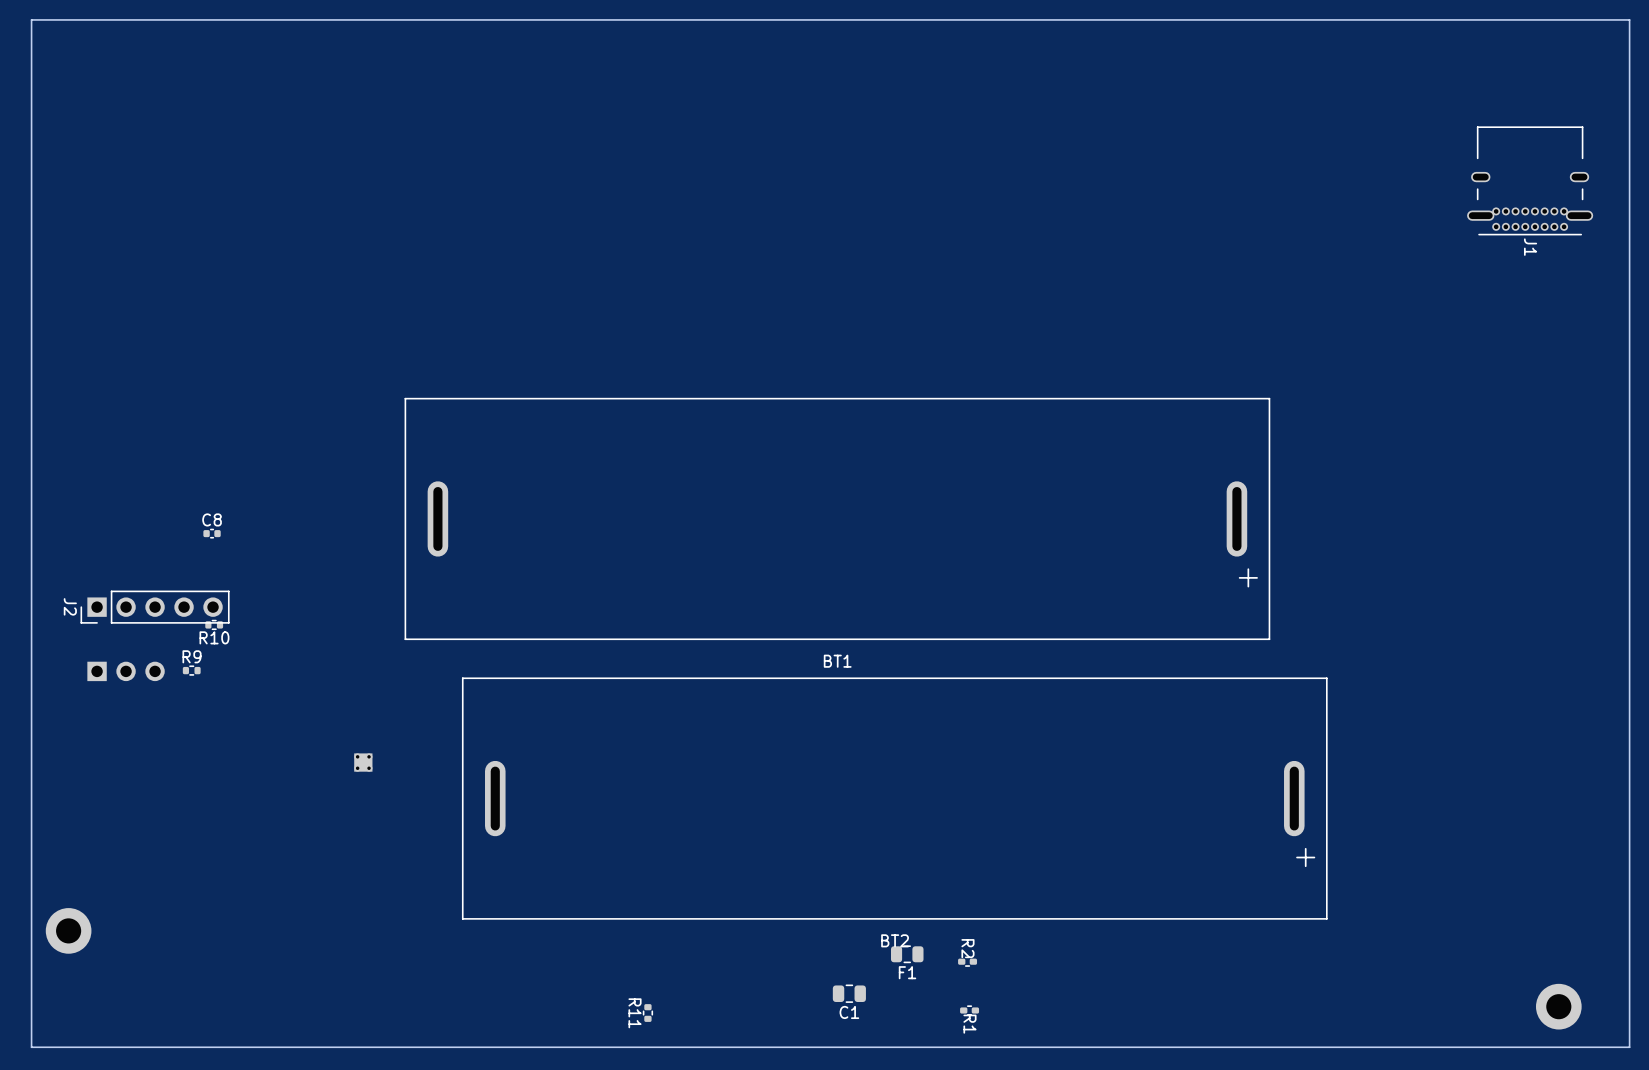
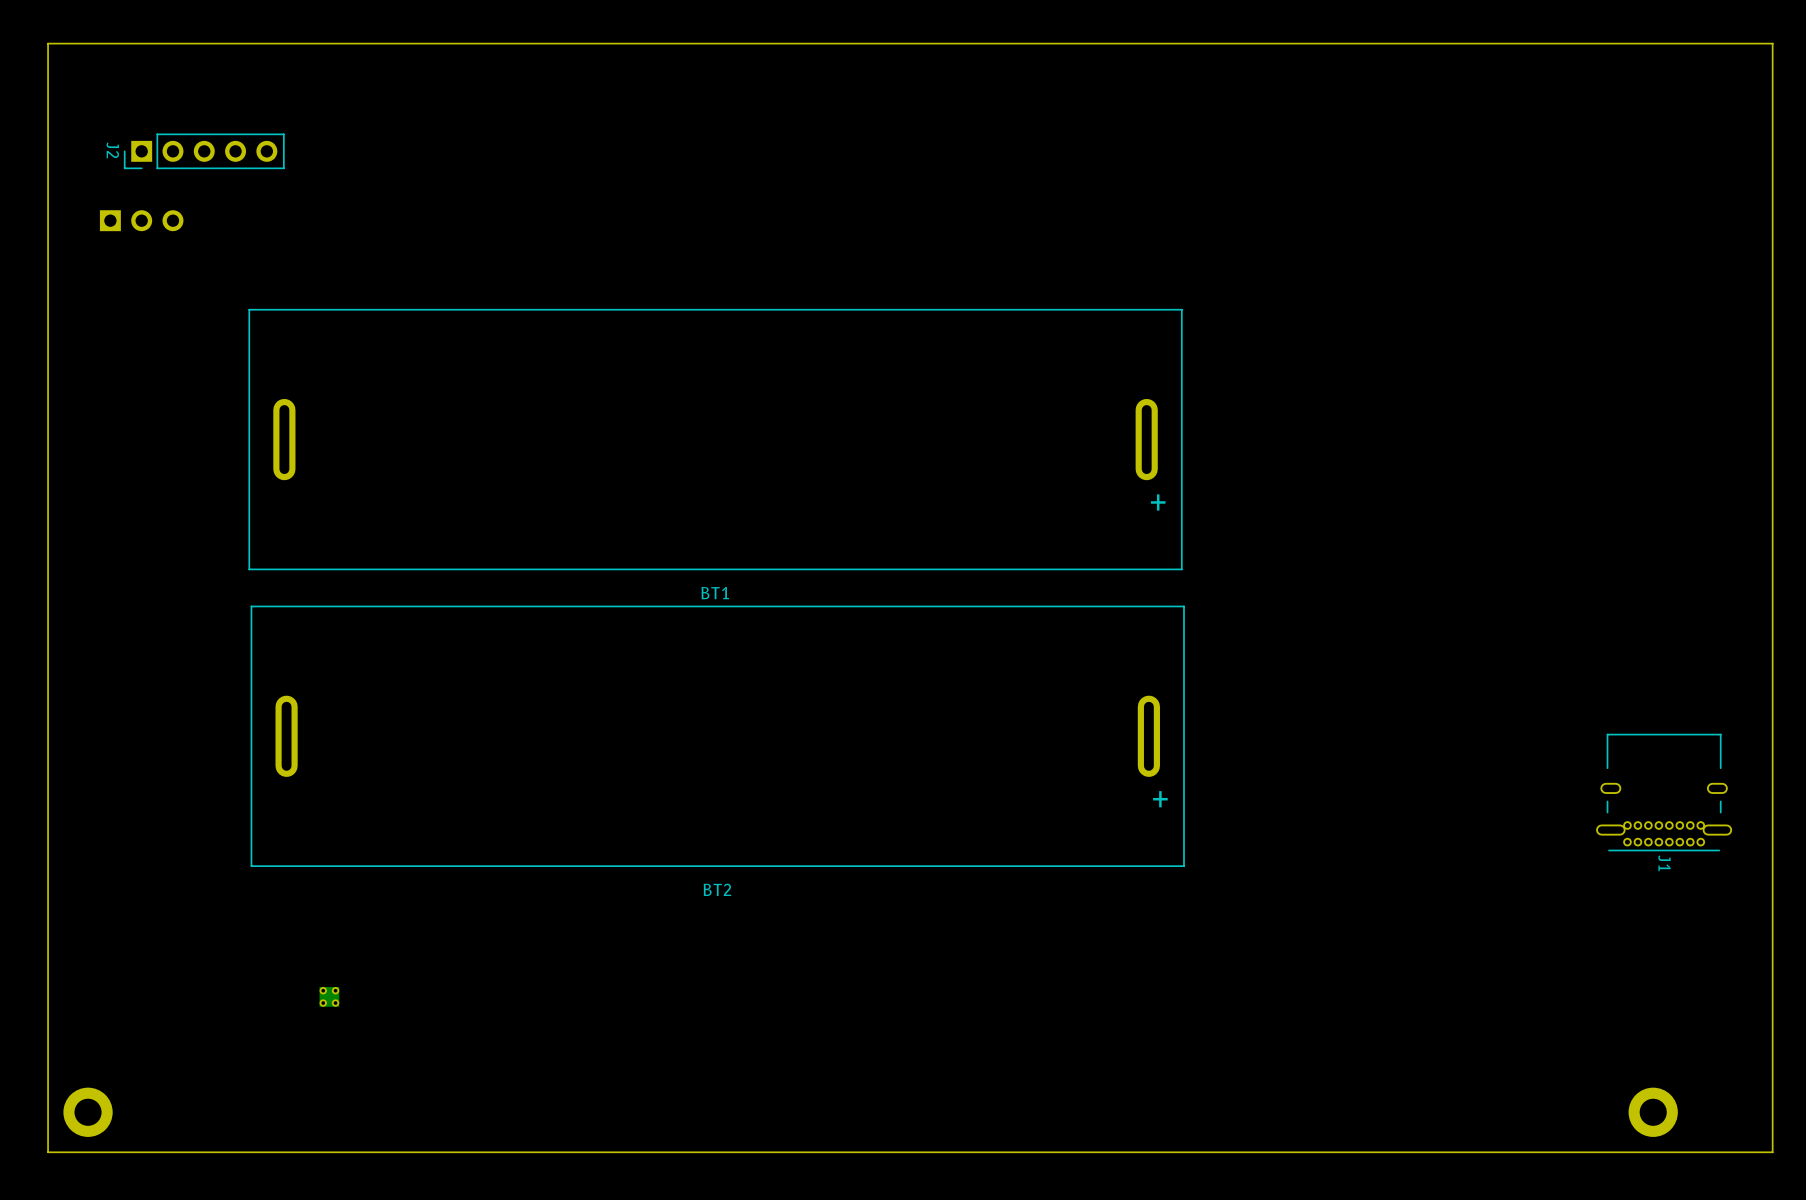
J1 position: (1530, 180) -> (1664, 792)
part: none -> (141, 220)
BT1 position: (837, 518) -> (715, 439)
C8: (212, 533) -> none
J2 position: (155, 607) -> (204, 151)
R10: (214, 624) -> none
R9: (191, 670) -> none
part: (126, 671) -> none
part position: (363, 762) -> (329, 996)
BT2 position: (894, 798) -> (717, 736)
part position: (68, 930) -> (88, 1112)
F1: (907, 954) -> none
R2: (967, 961) -> none
C1: (849, 993) -> none
part position: (1558, 1006) -> (1653, 1112)
R1: (969, 1010) -> none
R11: (647, 1013) -> none

